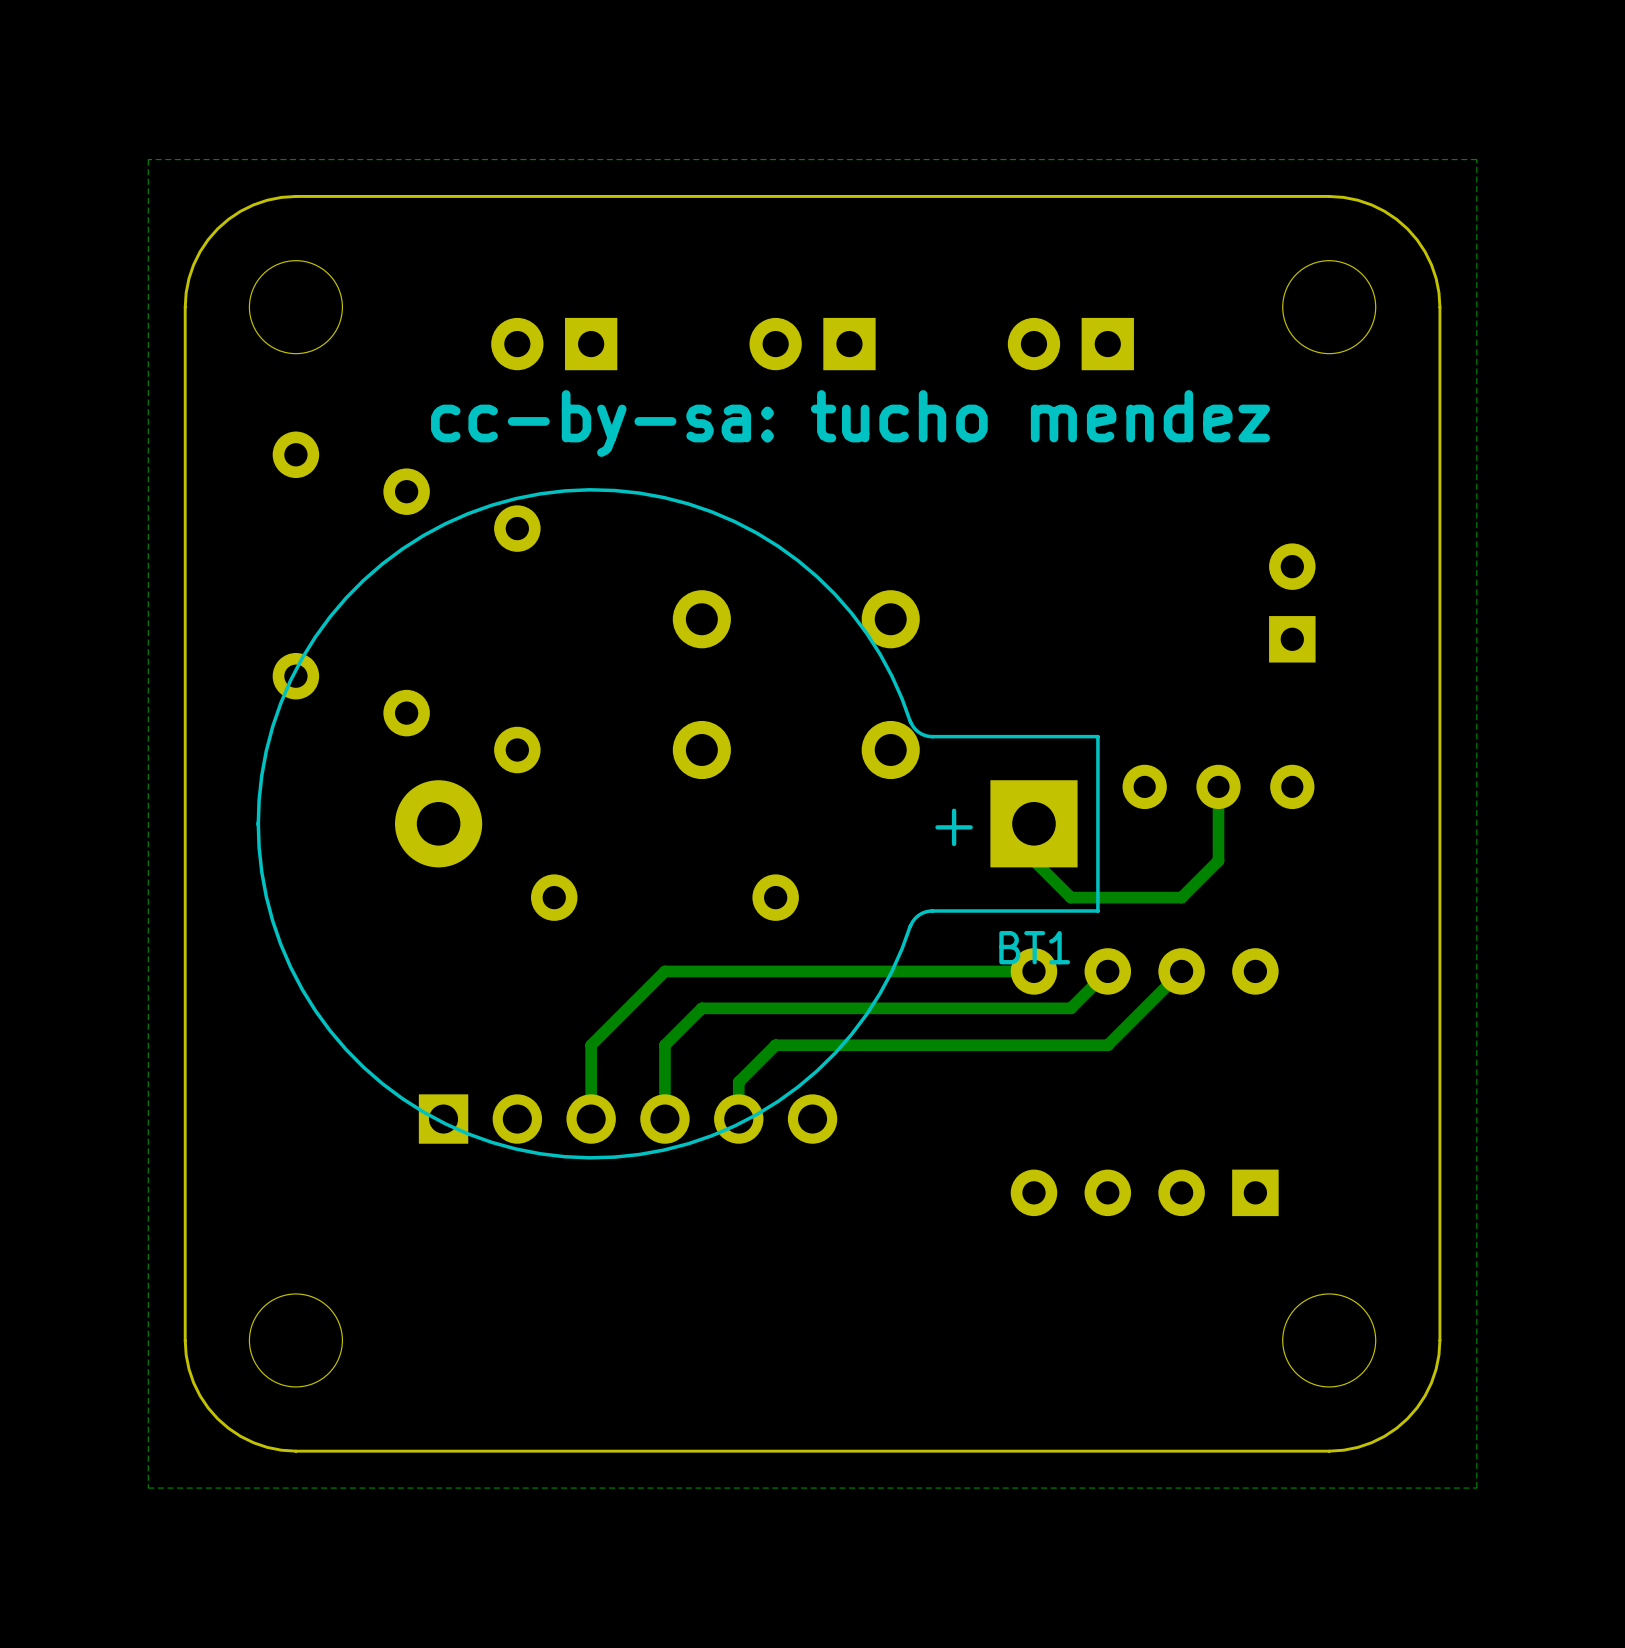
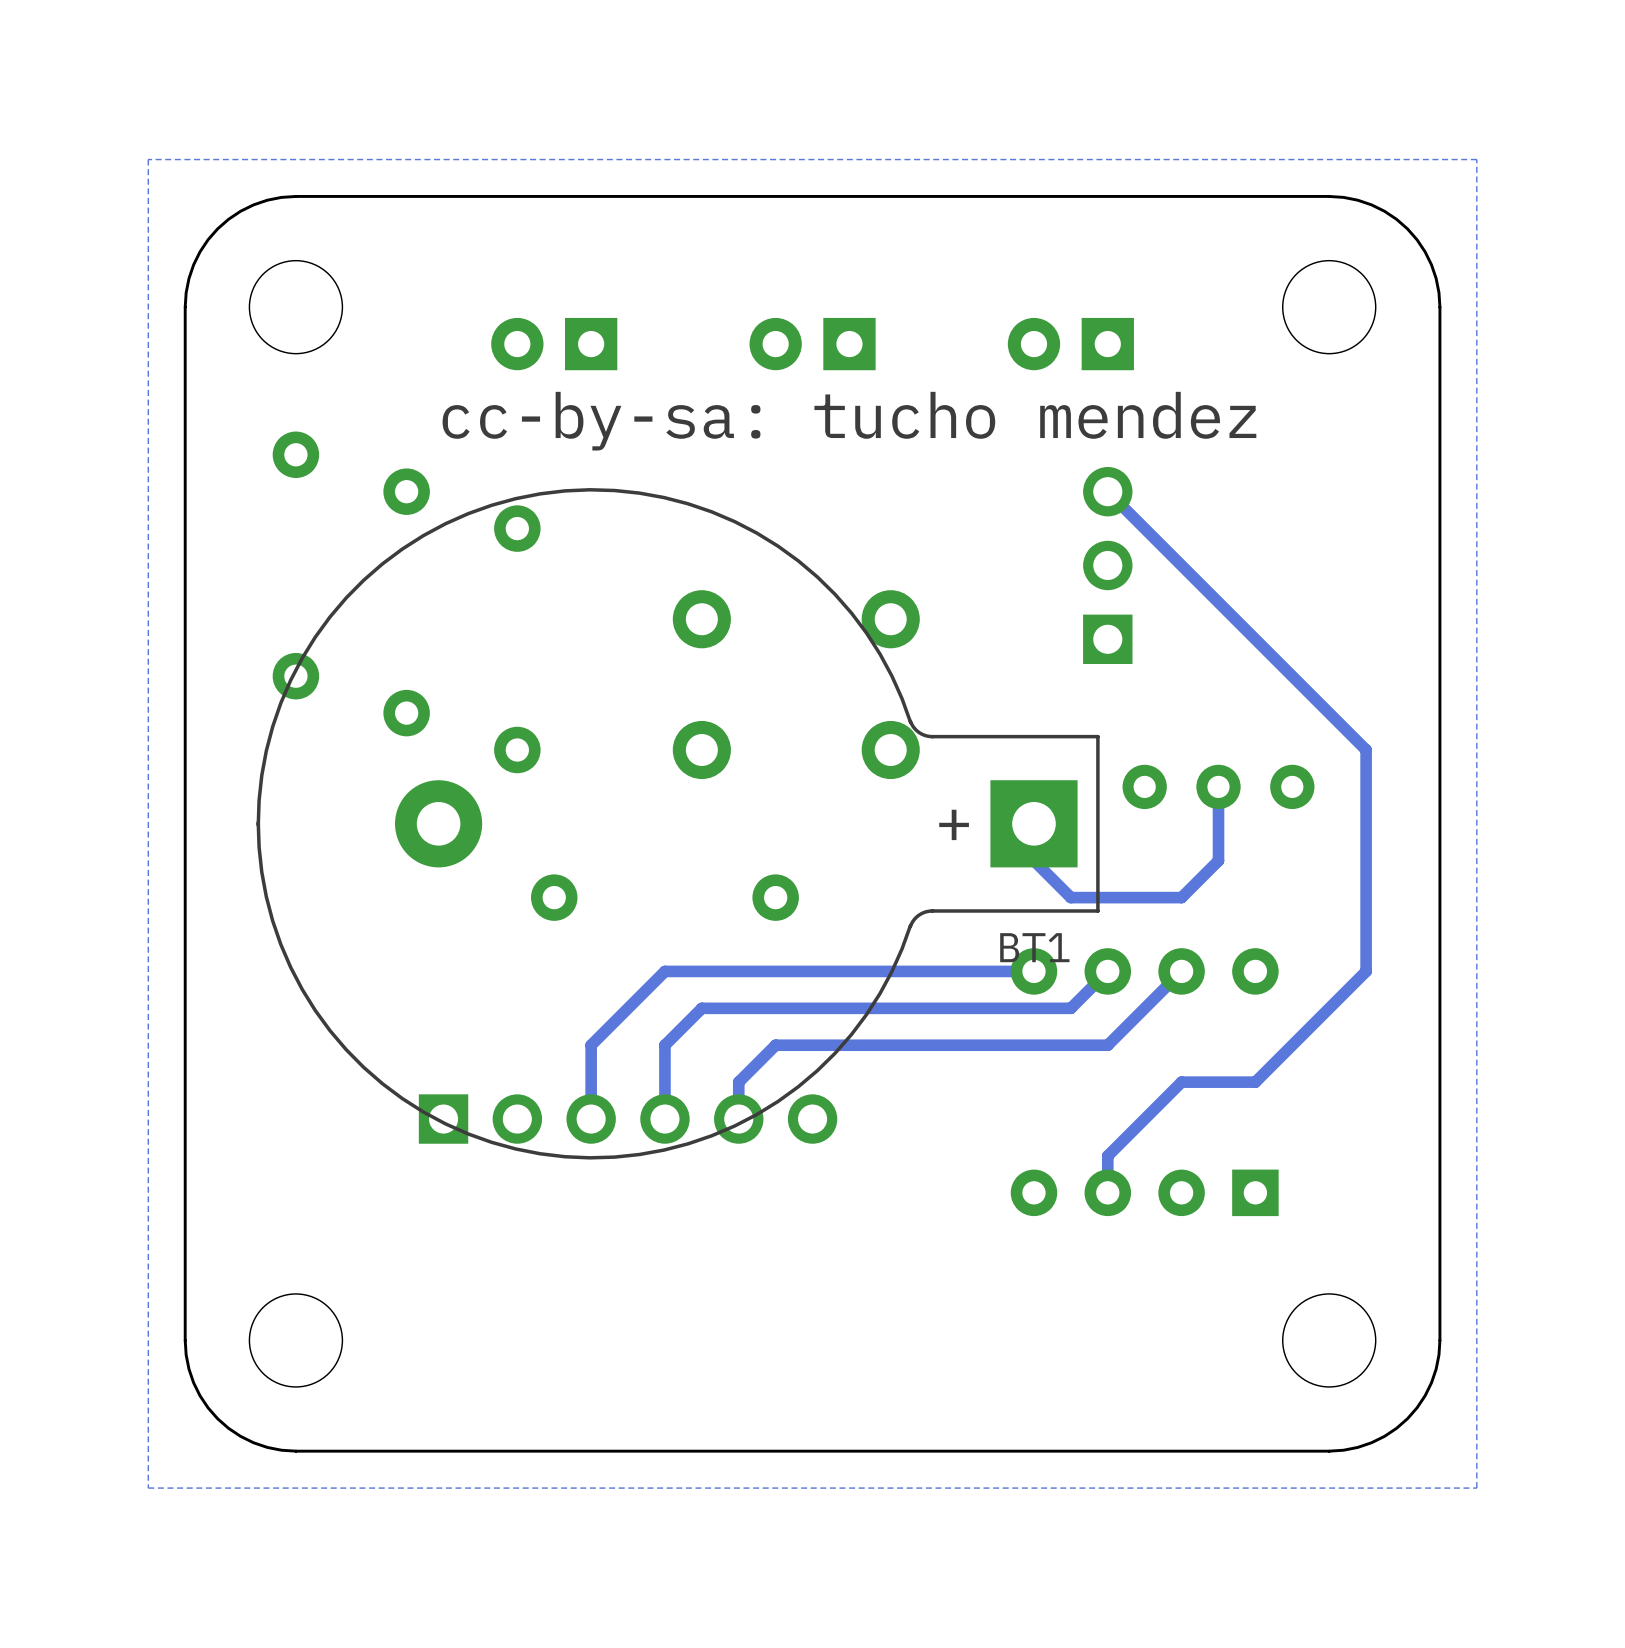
track: none -> (1107, 491) (1366, 750) (1366, 971) (1255, 1082) (1181, 1082) (1107, 1155) (1107, 1192)
part: none -> (1107, 565)
part: (1292, 602) -> none

